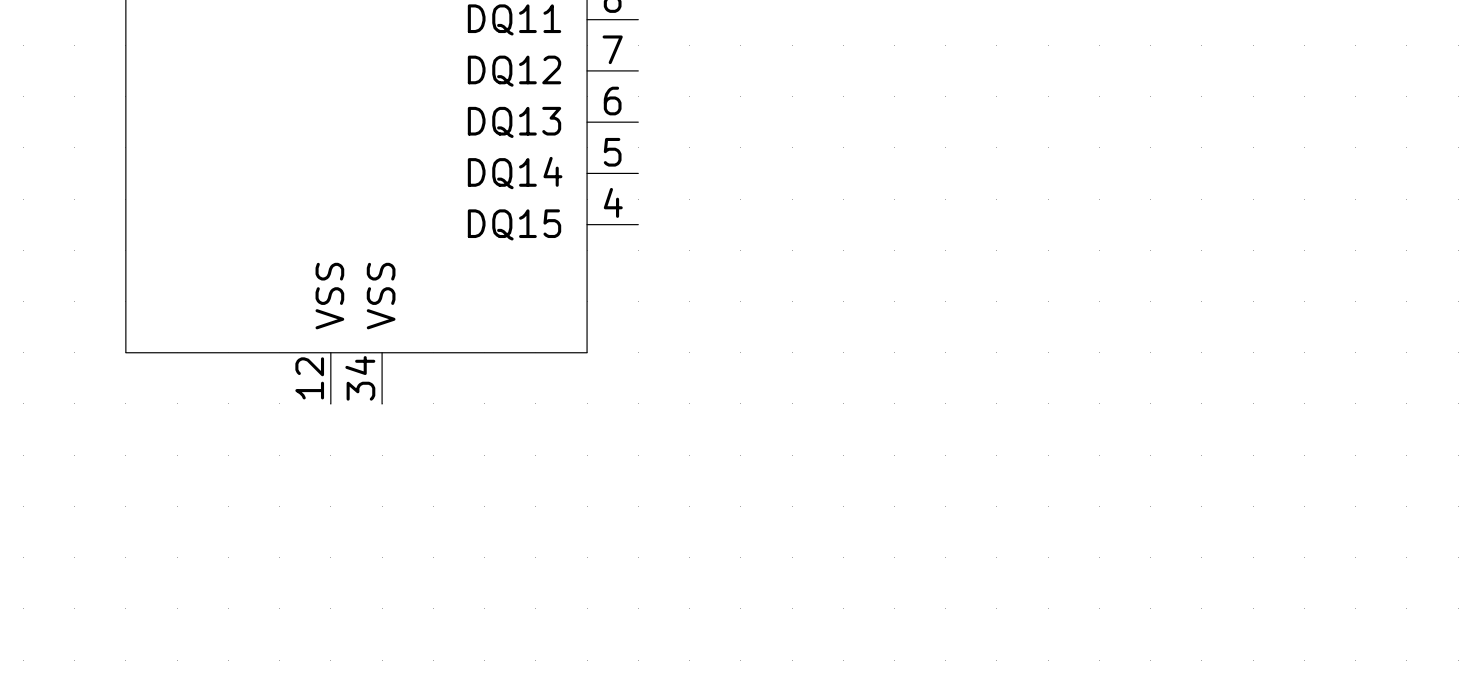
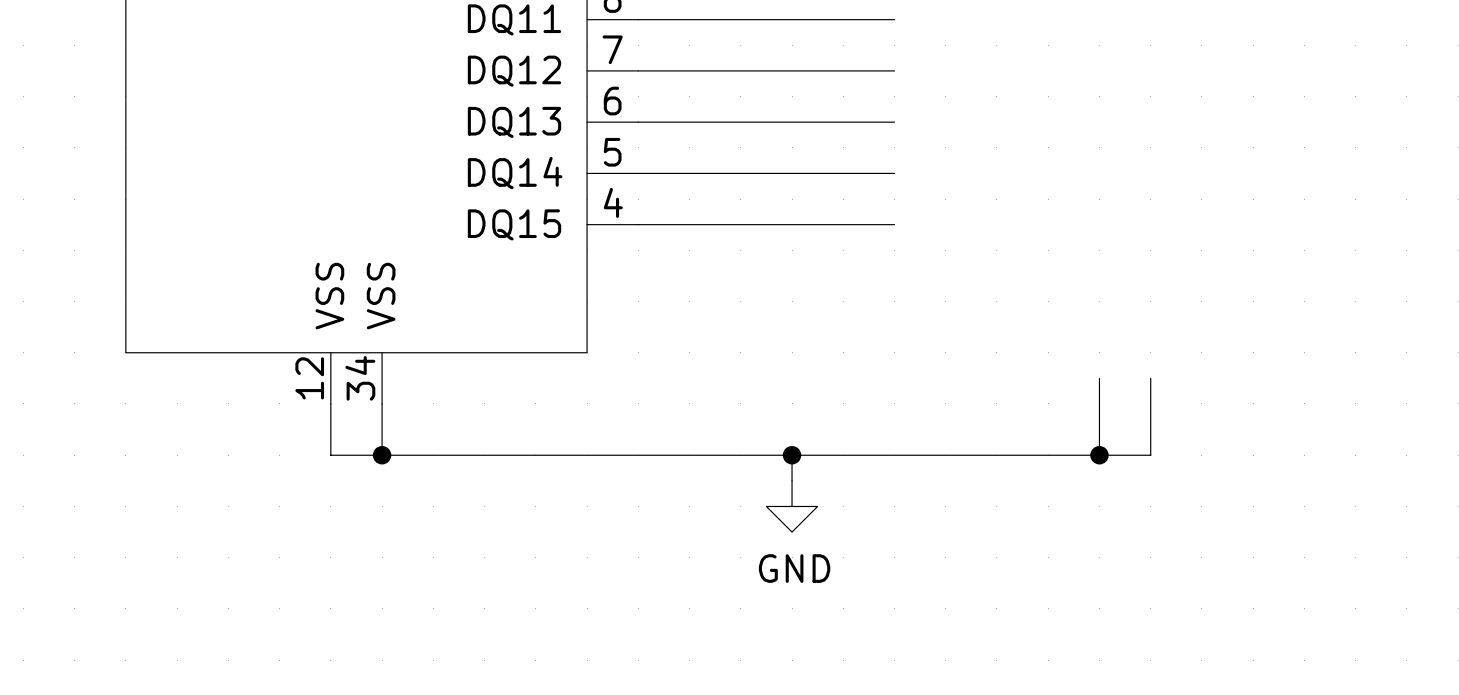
wire: none -> (638, 19) (894, 19)
wire: none -> (638, 70) (894, 70)
wire: none -> (638, 122) (894, 122)
wire: none -> (638, 173) (894, 173)
wire: none -> (638, 224) (894, 224)
wire: none -> (1099, 378) (1099, 455)
wire: none -> (1150, 378) (1150, 455) (330, 455) (330, 403)
wire: none -> (382, 403) (382, 455)
junction: none -> (382, 455)
wire: none -> (792, 455) (792, 480)
junction: none -> (792, 455)
junction: none -> (1099, 455)
power symbol: none -> GND (792, 506)

